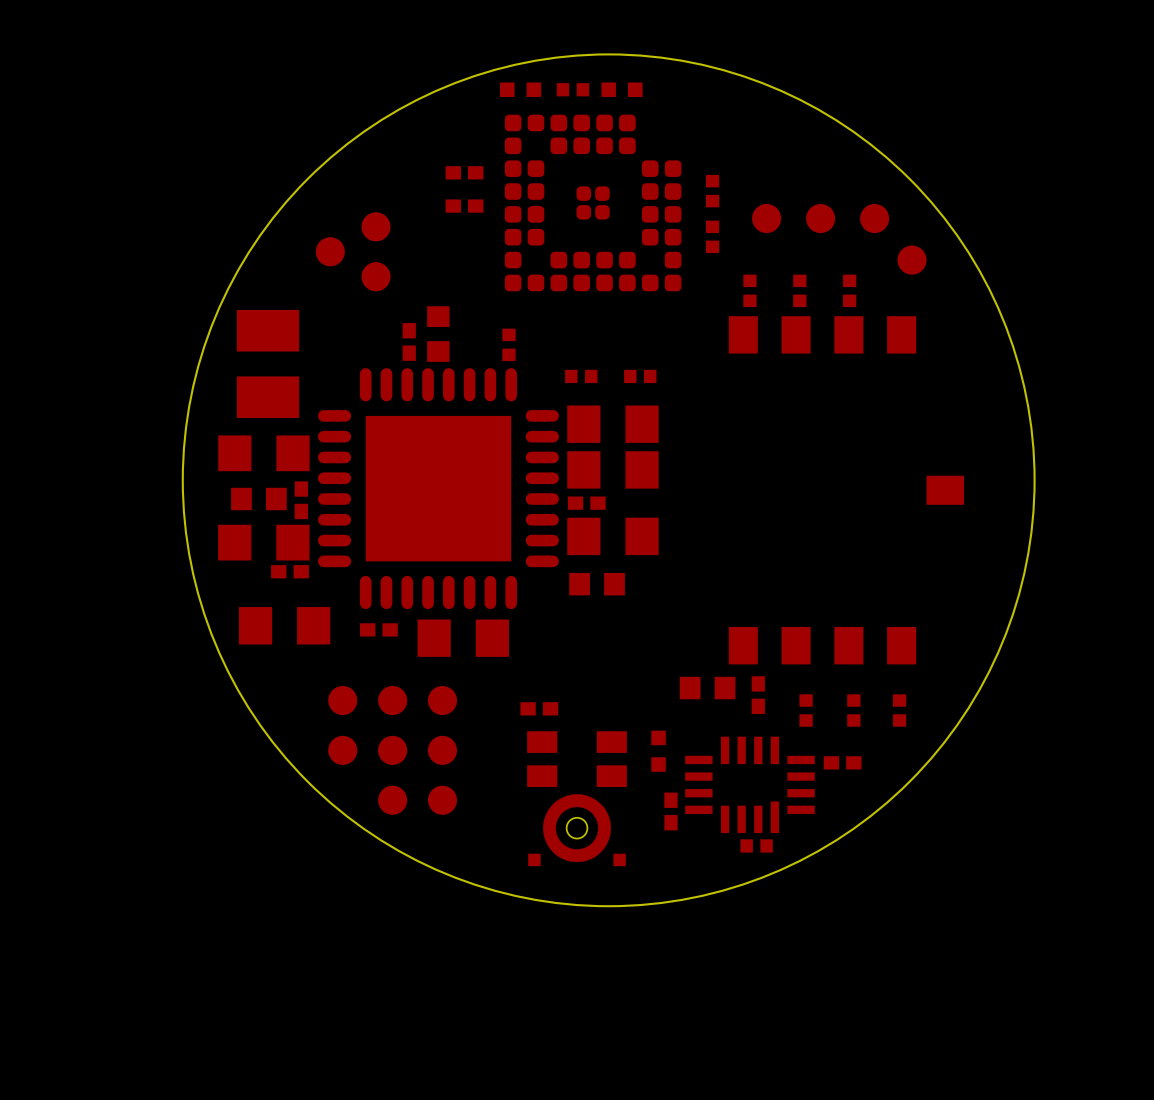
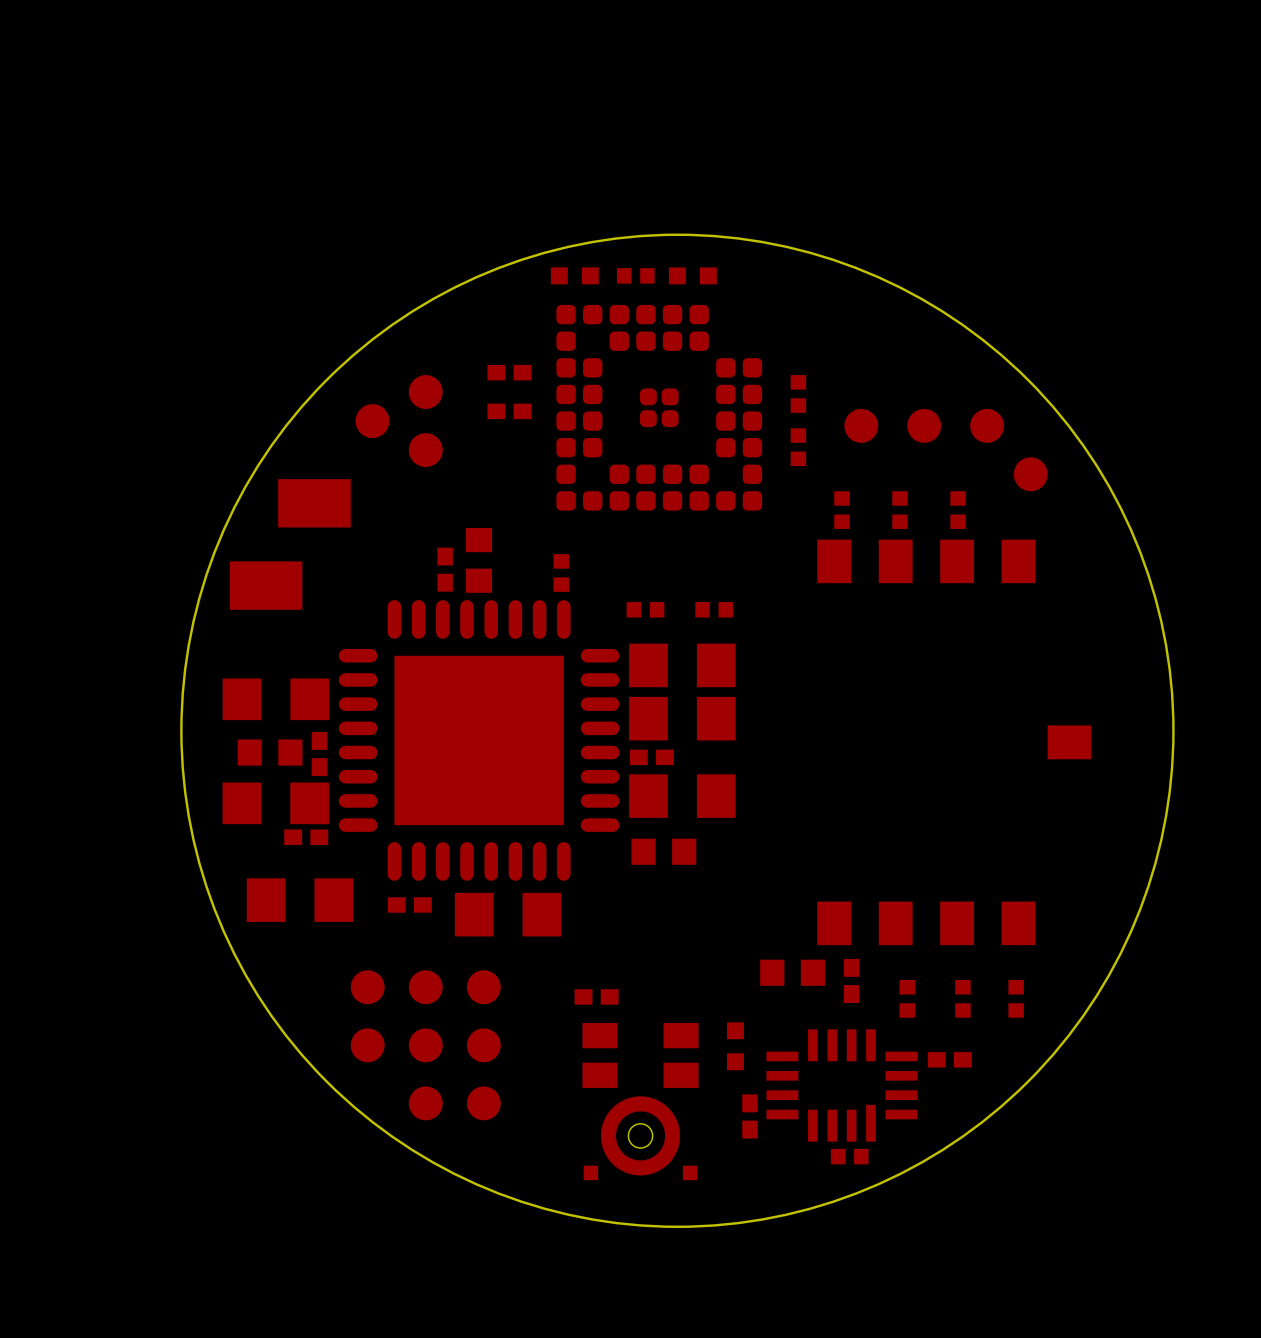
part: none -> (425, 392)
part: none -> (372, 421)
part: (376, 226) -> none
part: none -> (425, 450)
part: (330, 251) -> none
part: (376, 276) -> none
part: none -> (314, 503)
part: (267, 330) -> none
part: none -> (266, 585)
part: (267, 397) -> none

